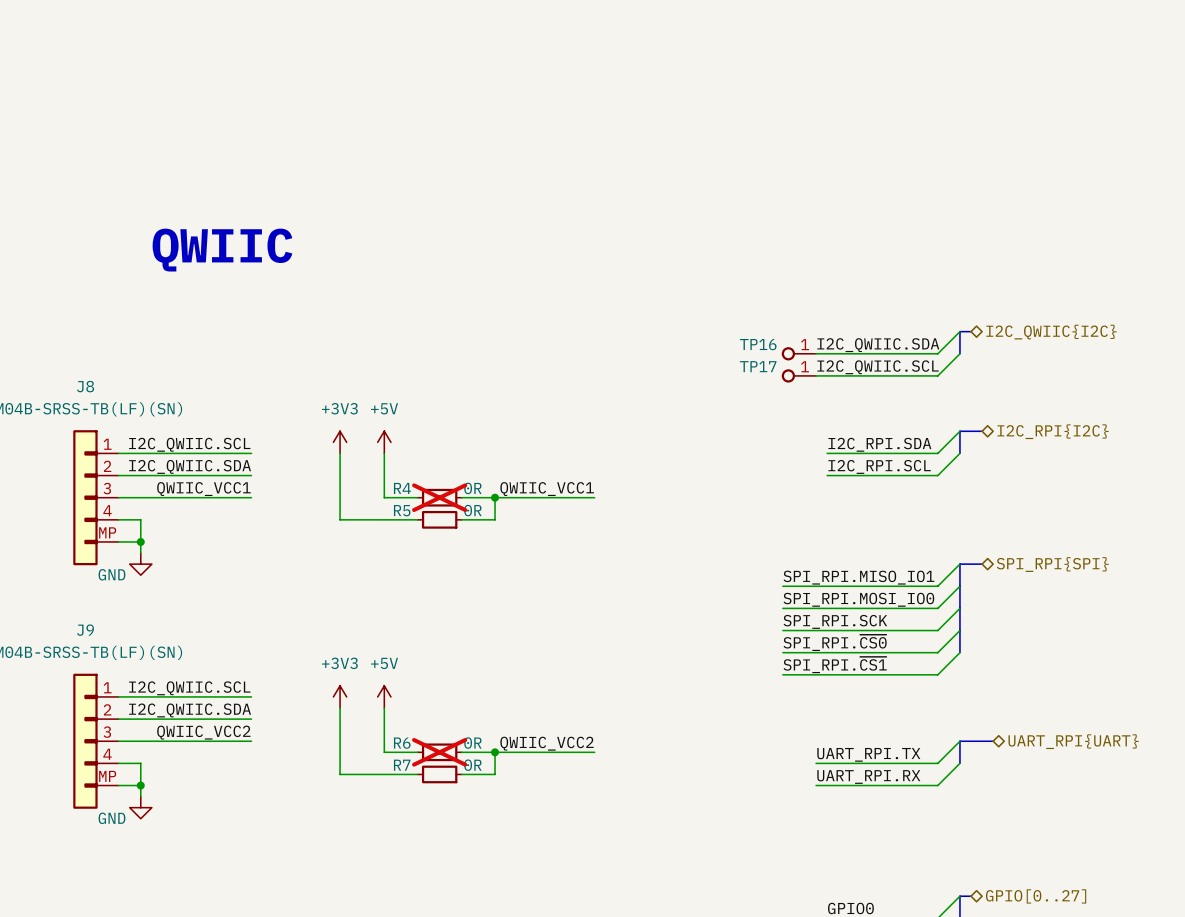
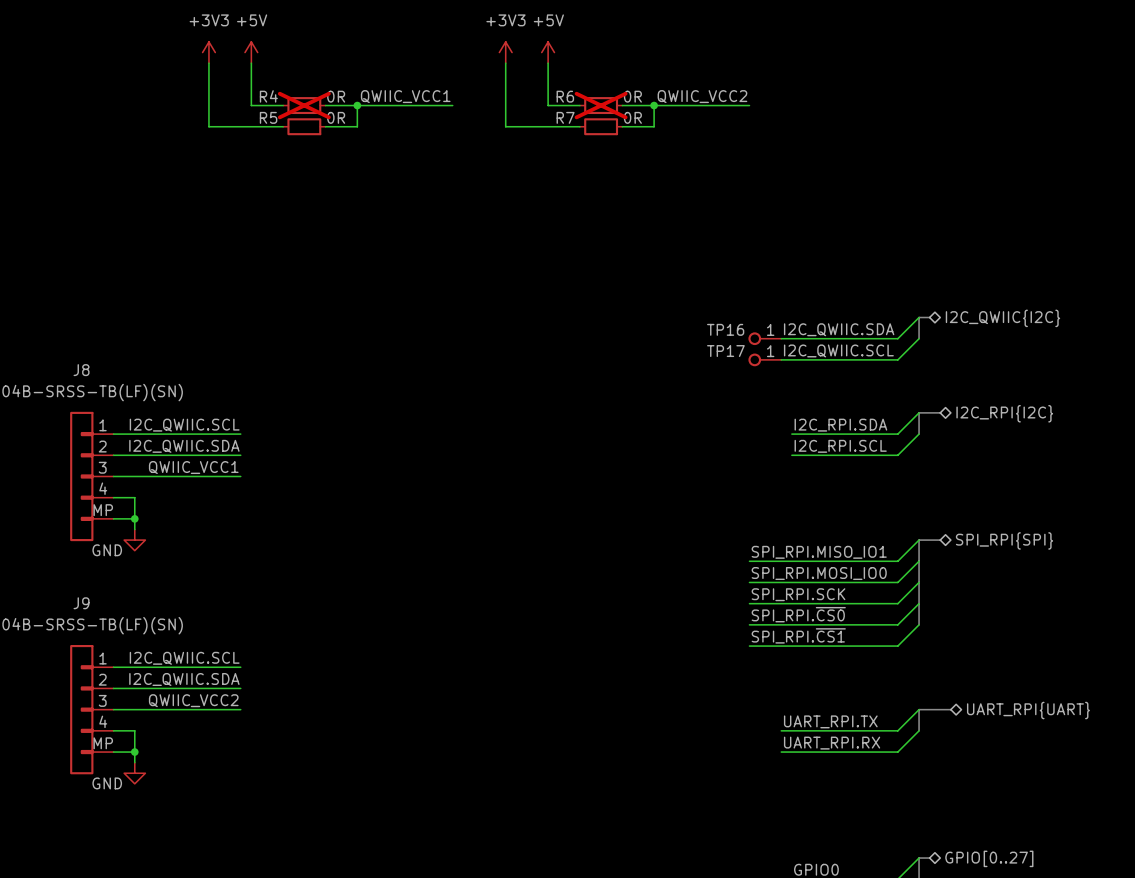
power symbol: none -> +3V3 (208, 52)
power symbol: none -> +5V (251, 52)
power symbol: none -> +3V3 (505, 52)
power symbol: none -> +5V (548, 52)
wire: none -> (208, 63) (208, 126) (283, 126)
wire: none -> (251, 63) (251, 105) (283, 105)
wire: none -> (505, 63) (505, 126) (579, 126)
wire: none -> (548, 63) (548, 105) (579, 105)
label: none -> QWIIC_VCC1 (405, 96)
label: none -> QWIIC_VCC2 (702, 96)
wire: none -> (325, 105) (452, 105)
wire: none -> (357, 105) (357, 126) (325, 126)
junction: none -> (357, 105)
wire: none -> (622, 105) (749, 105)
wire: none -> (654, 105) (654, 126) (622, 126)
junction: none -> (654, 105)
text: QWIIC (222, 250) -> none
power symbol: +3V3 (340, 442) -> none
power symbol: +5V (384, 442) -> none
wire: (340, 453) (340, 519) (417, 519) -> none
wire: (384, 453) (384, 497) (417, 497) -> none
label: QWIIC_VCC1 (547, 489) -> none
R4 position: (439, 497) -> (304, 105)
wire: (461, 497) (594, 497) -> none
wire: (495, 497) (495, 519) (461, 519) -> none
junction: (495, 497) -> none
R5 position: (439, 519) -> (304, 126)
power symbol: +3V3 (340, 696) -> none
power symbol: +5V (384, 696) -> none
wire: (340, 708) (340, 774) (417, 774) -> none
wire: (384, 708) (384, 752) (417, 752) -> none
label: QWIIC_VCC2 (547, 743) -> none
R6 position: (439, 752) -> (601, 105)
wire: (461, 752) (594, 752) -> none
wire: (495, 752) (495, 774) (461, 774) -> none
junction: (495, 752) -> none
R7 position: (439, 774) -> (601, 126)

